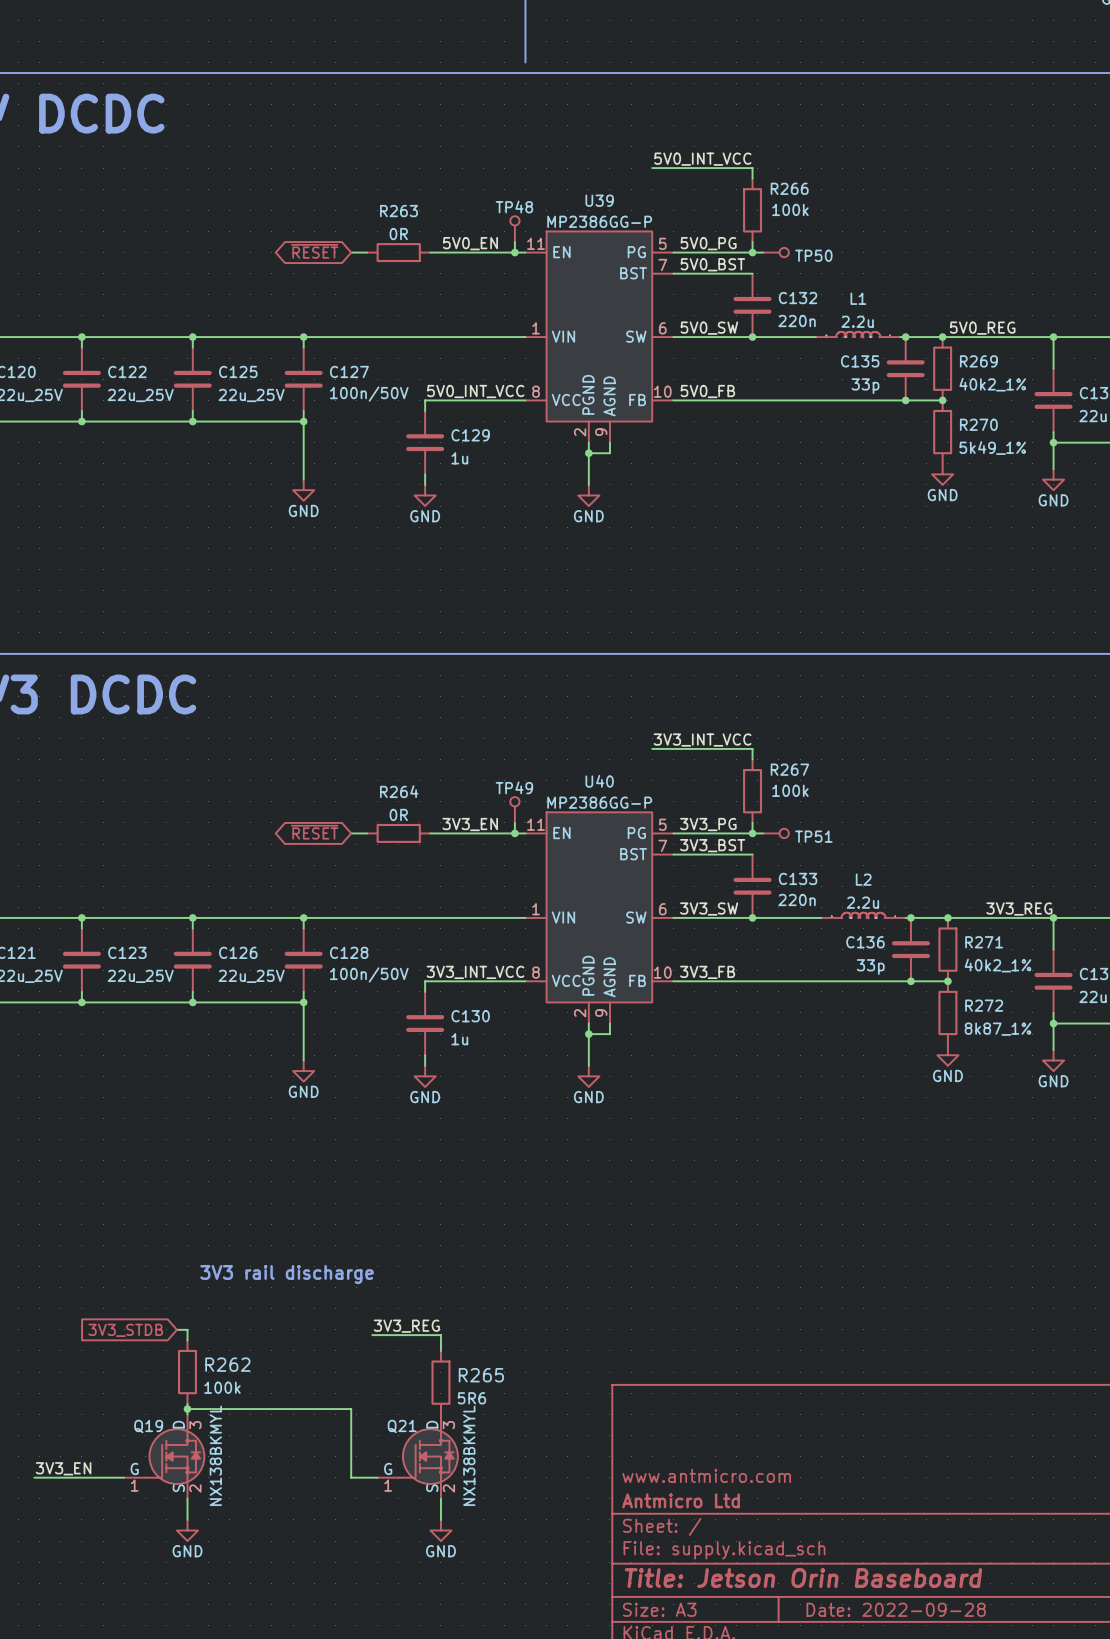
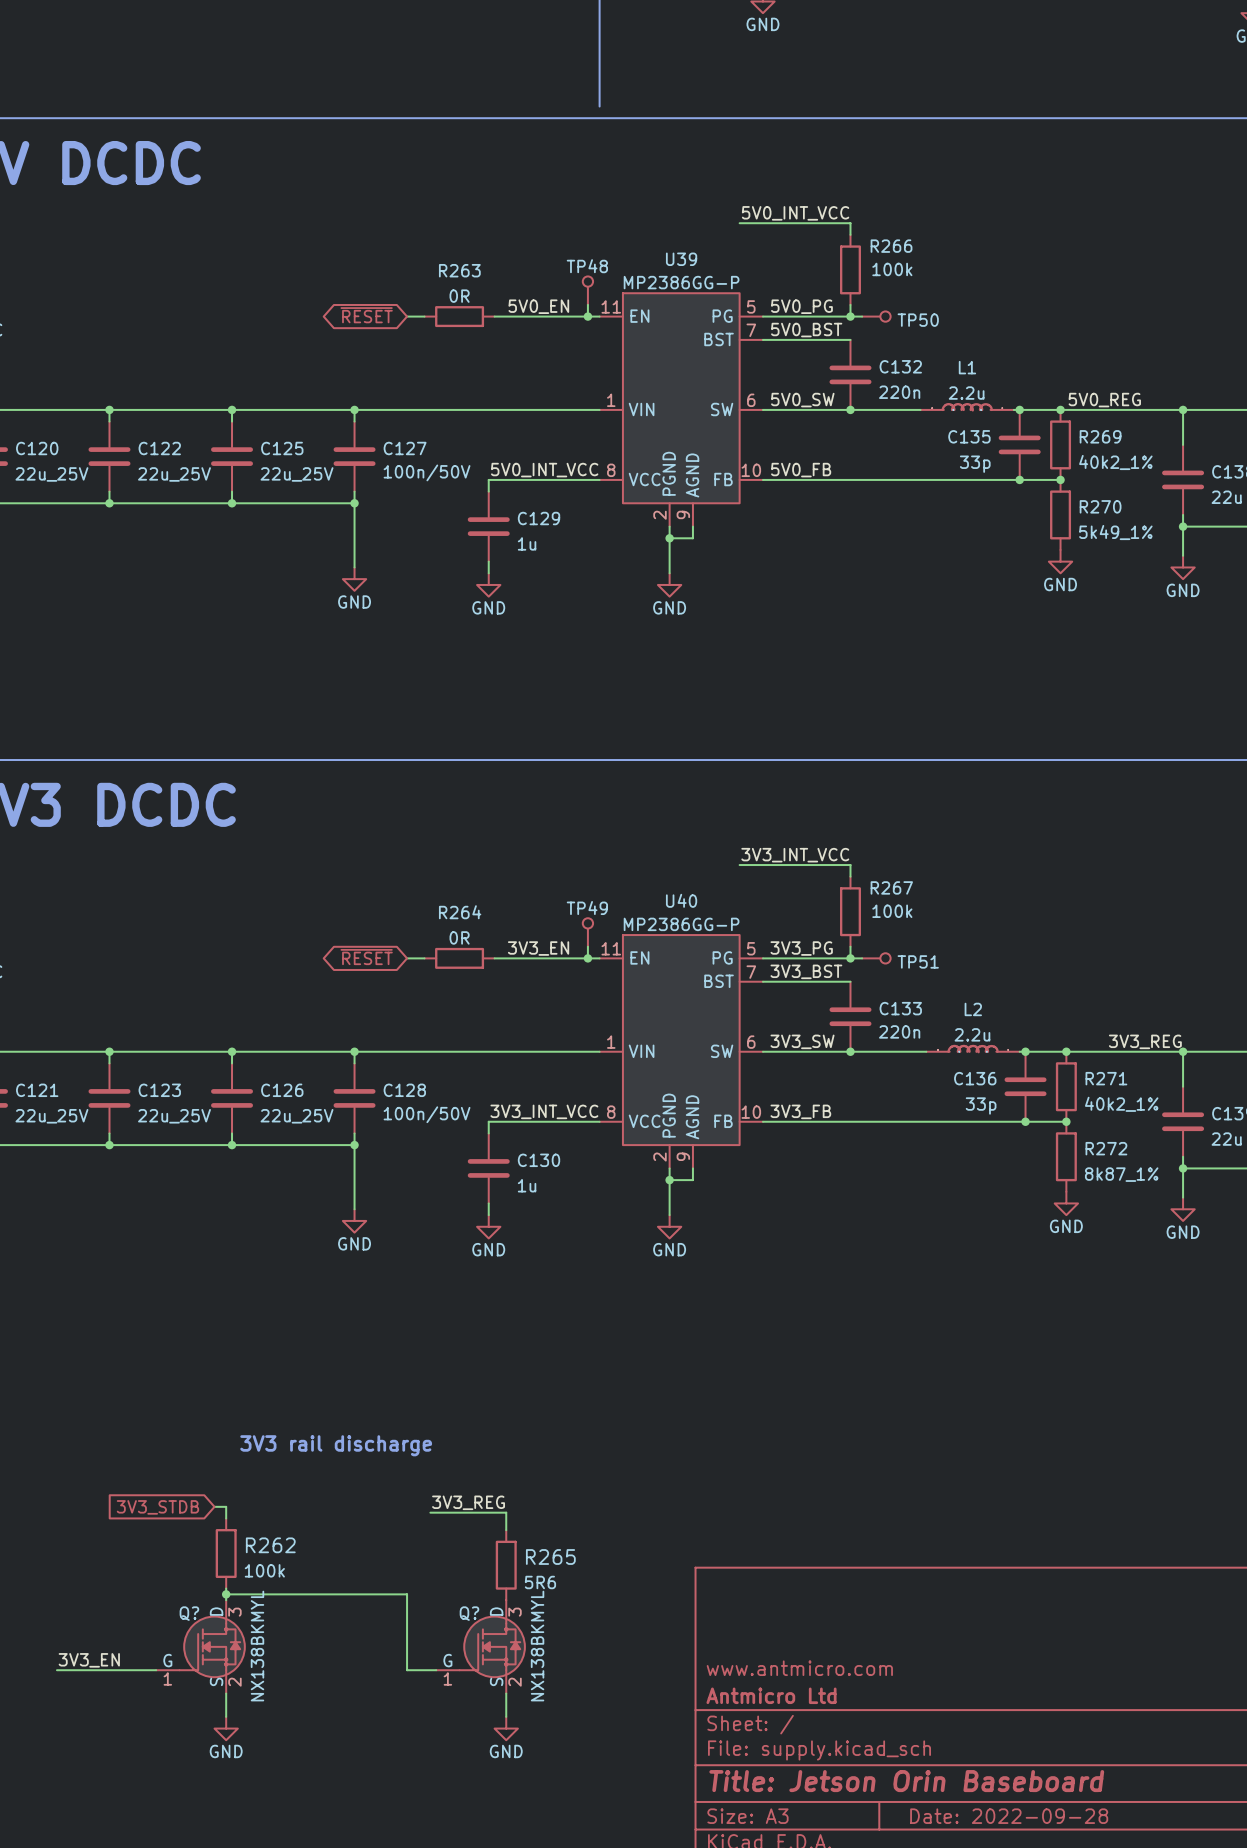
Q19 name: Q19 (148, 1426) -> Q? (189, 1613)
Q21 name: Q21 (402, 1426) -> Q? (469, 1613)

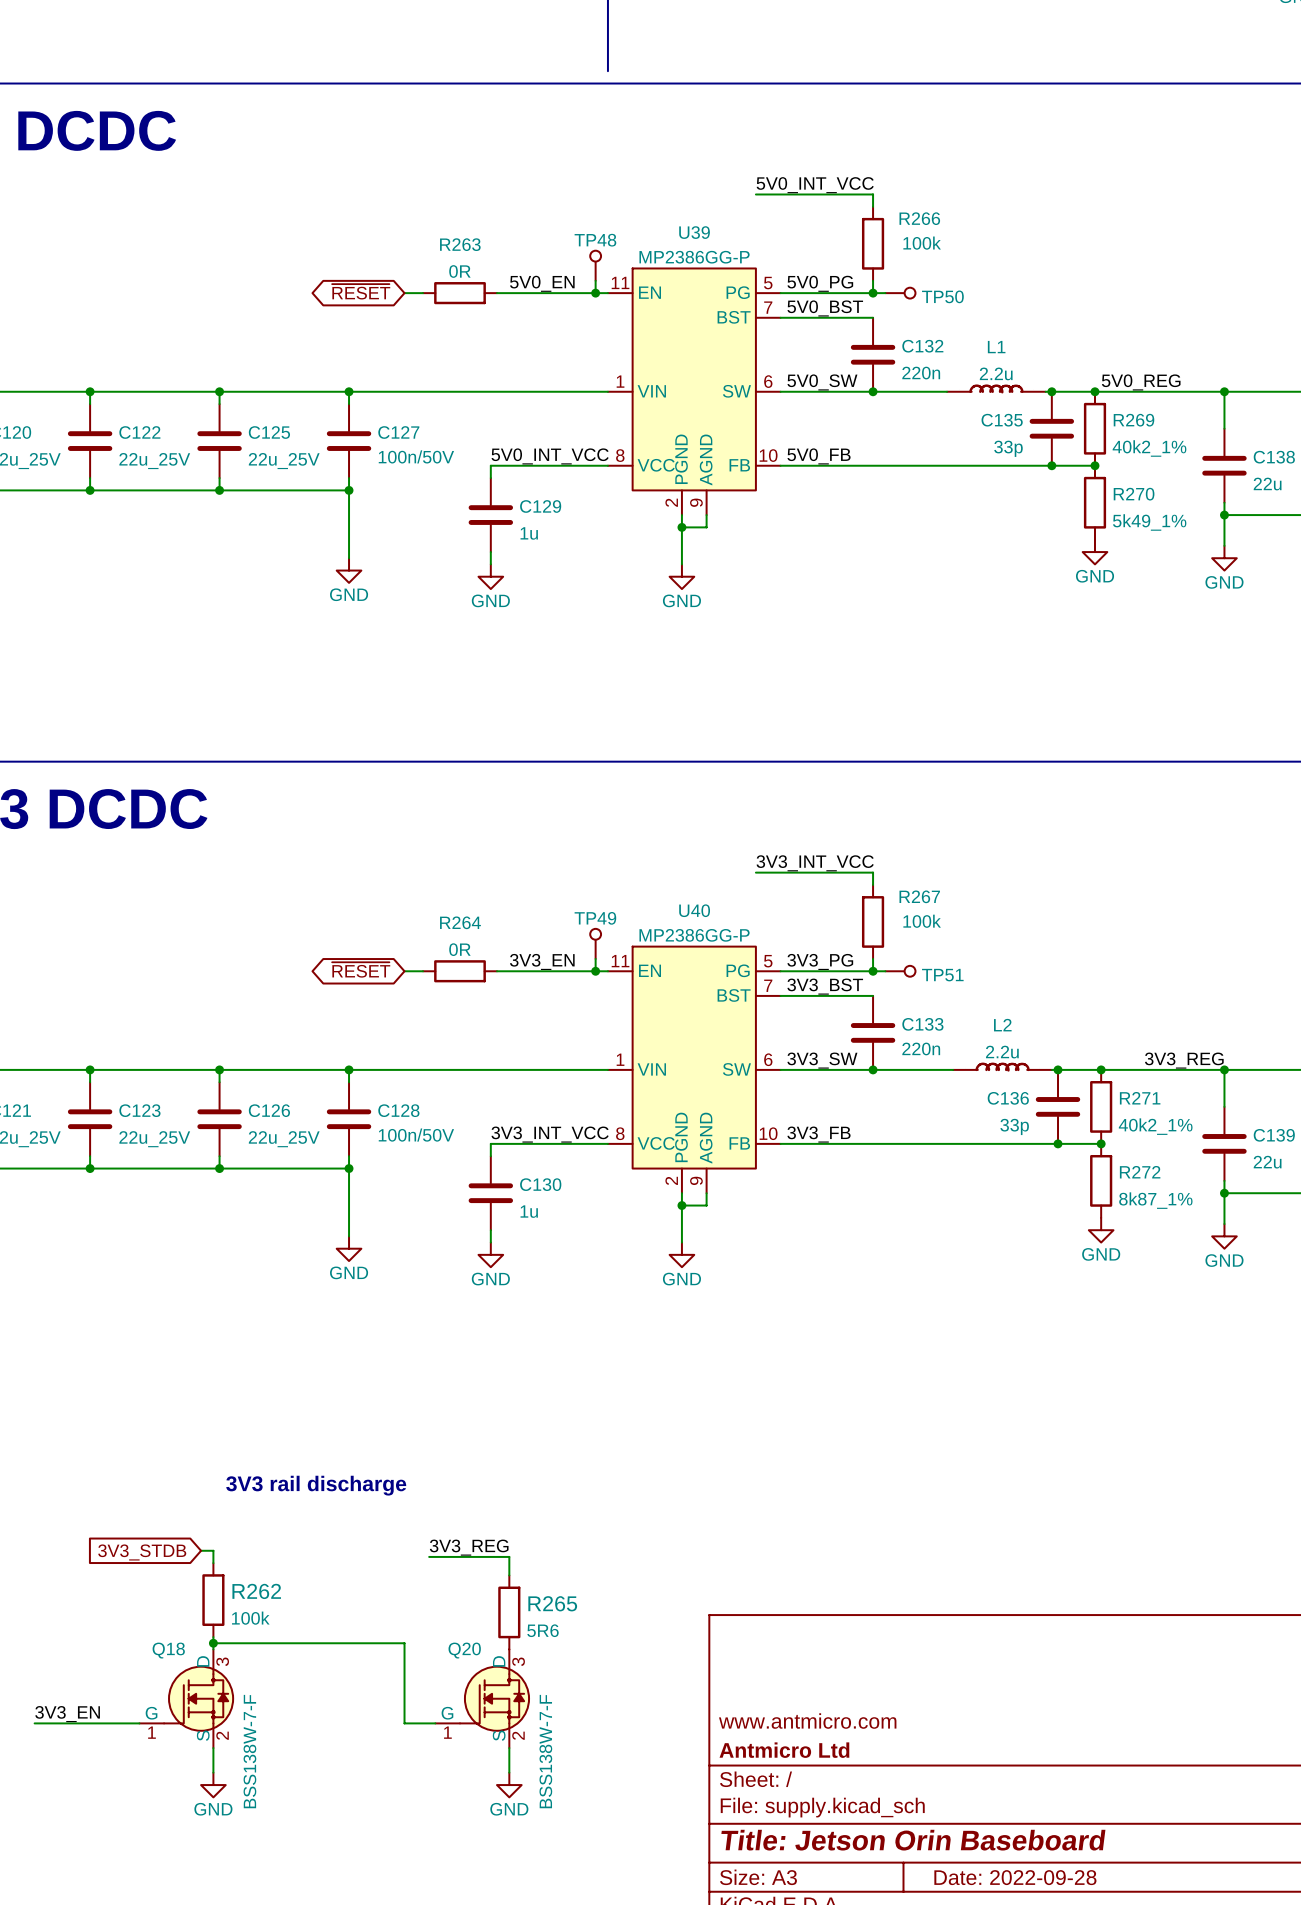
Q? name: Q? (189, 1613) -> Q18 (168, 1650)
Q? name: Q? (469, 1613) -> Q20 (464, 1650)
Q? value: NX138BKMYL (257, 1646) -> BSS138W-7-F (249, 1751)
Q? value: NX138BKMYL (537, 1646) -> BSS138W-7-F (545, 1751)

